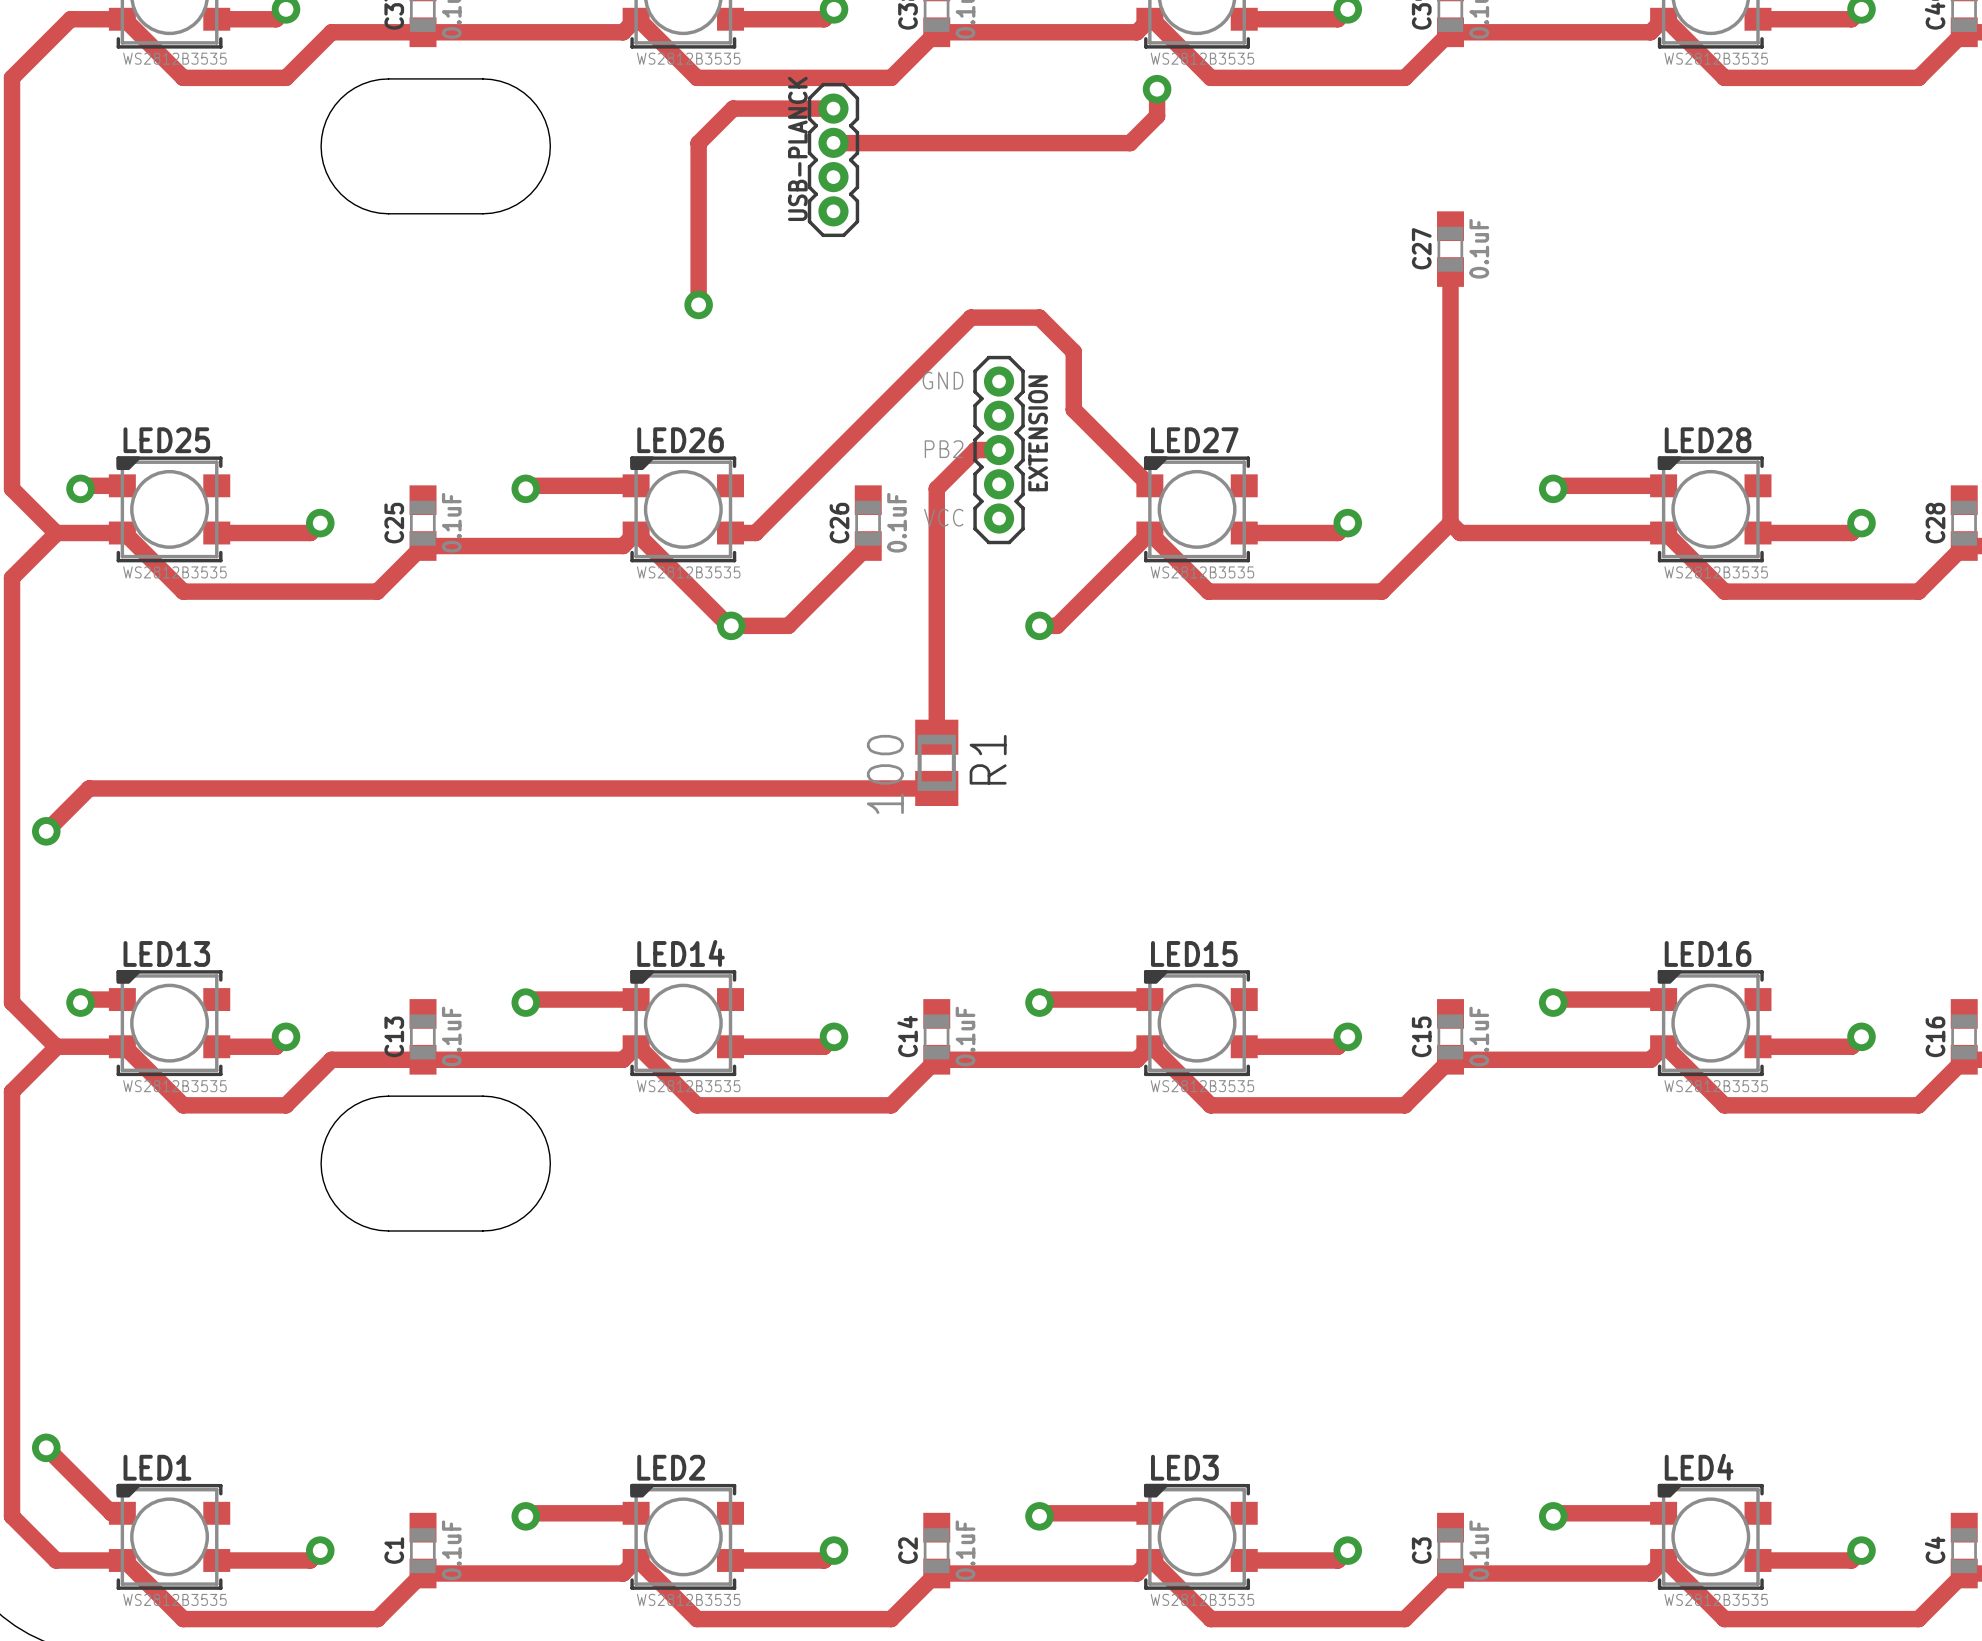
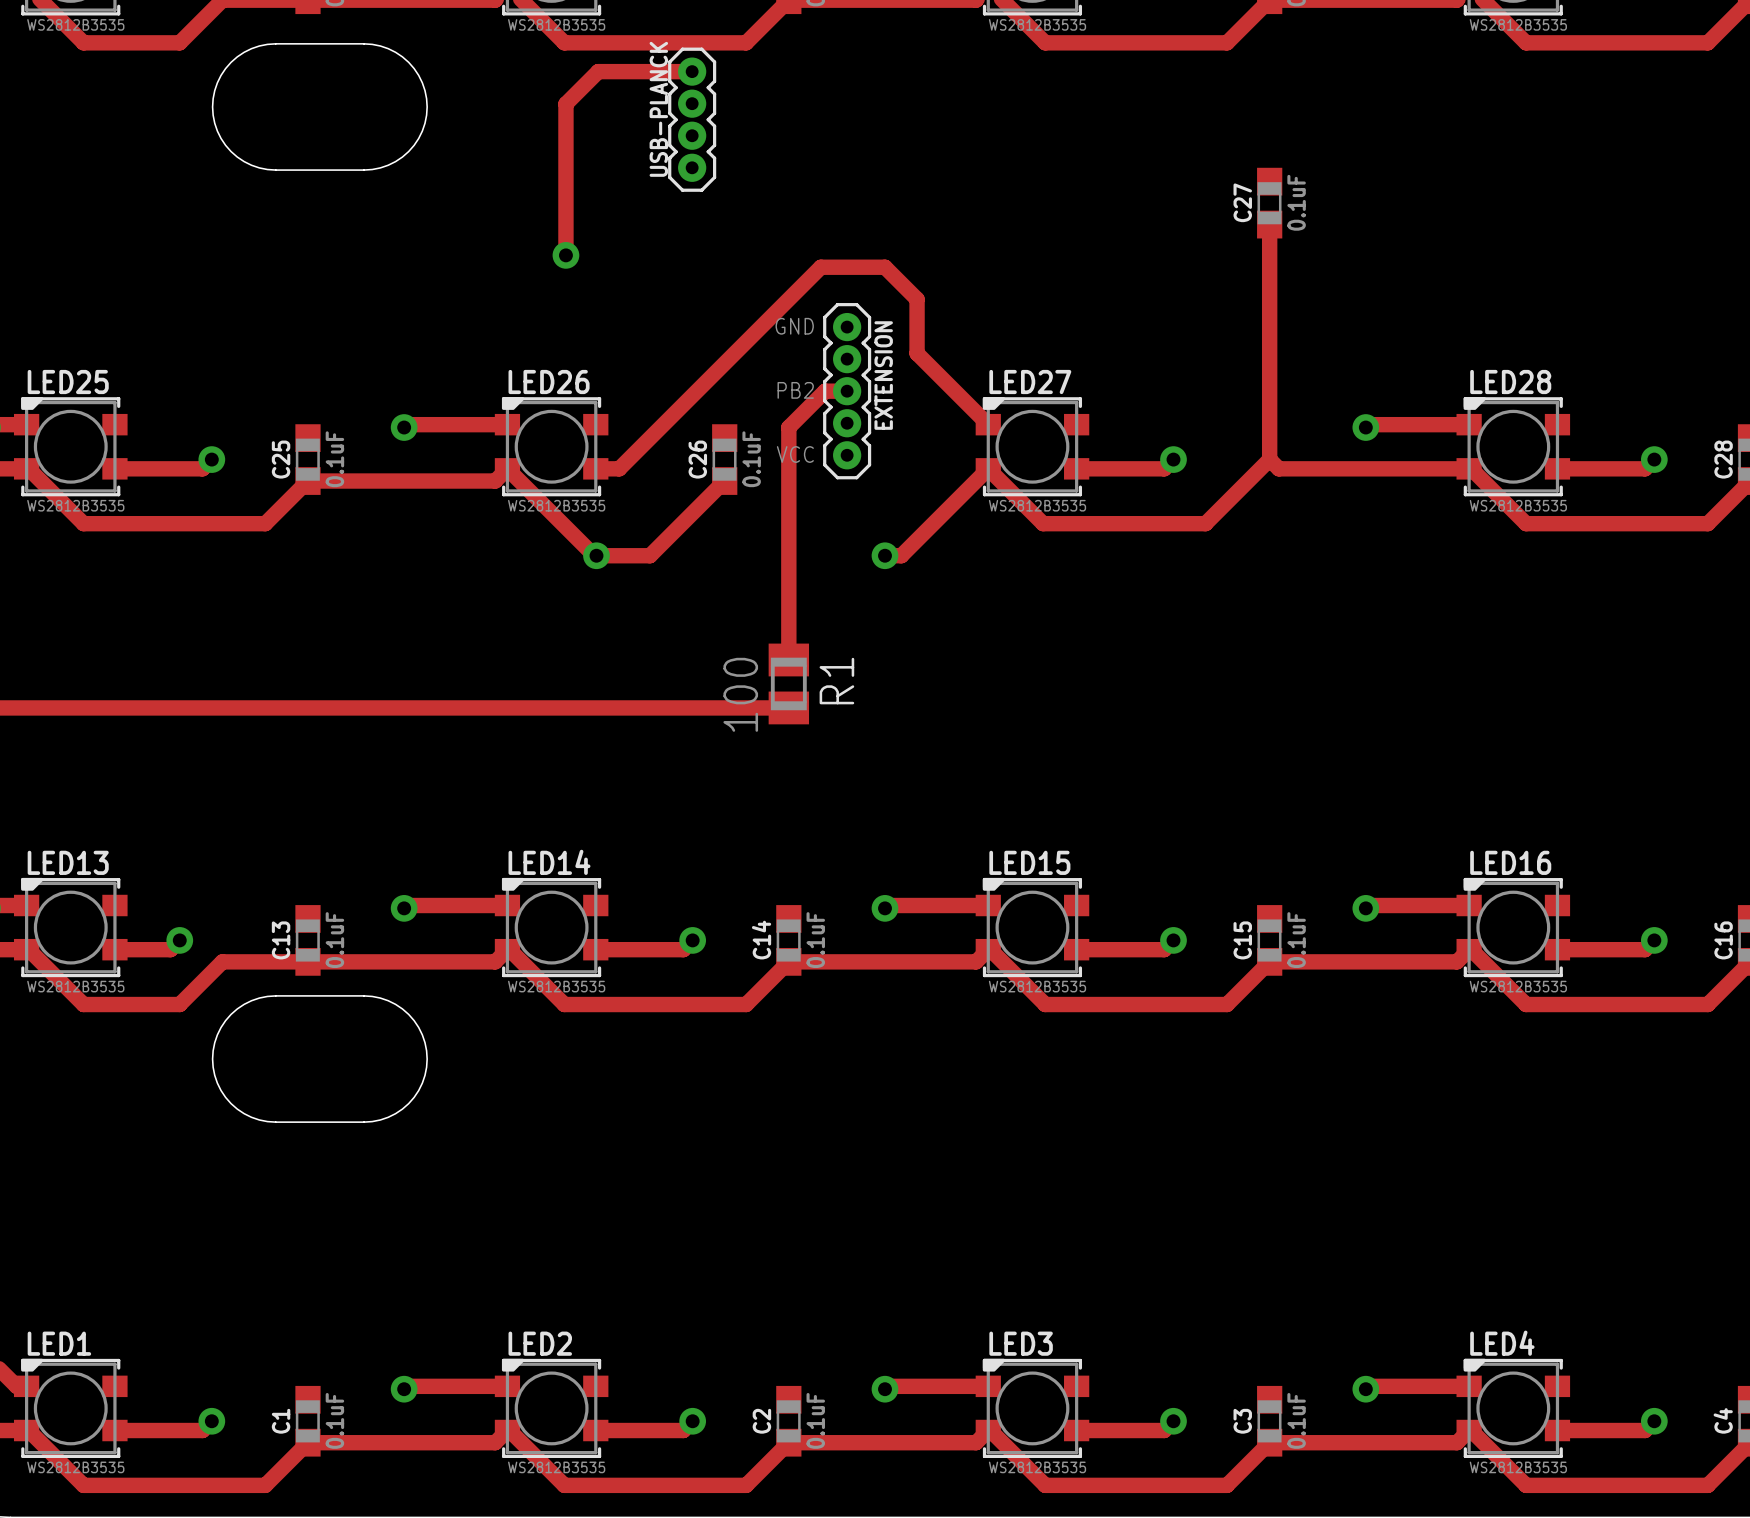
track: (1157, 89) (1157, 116) (1130, 143) (833, 143) -> none
via: (1157, 89) -> none

